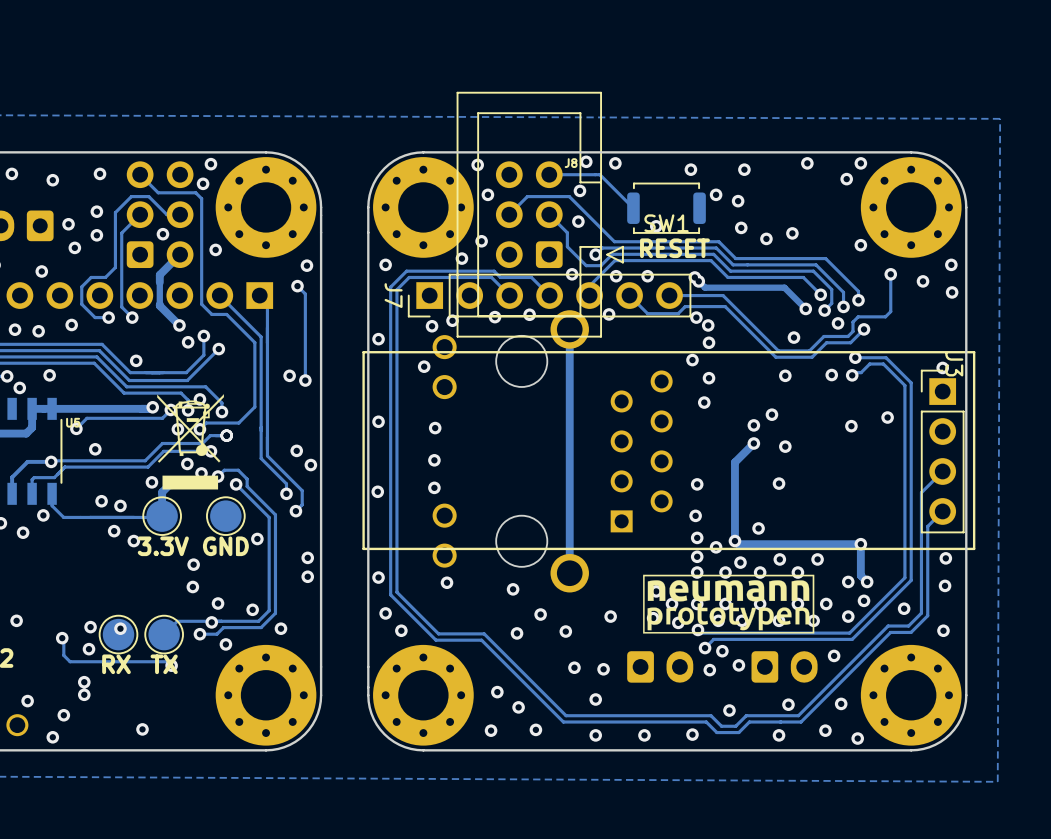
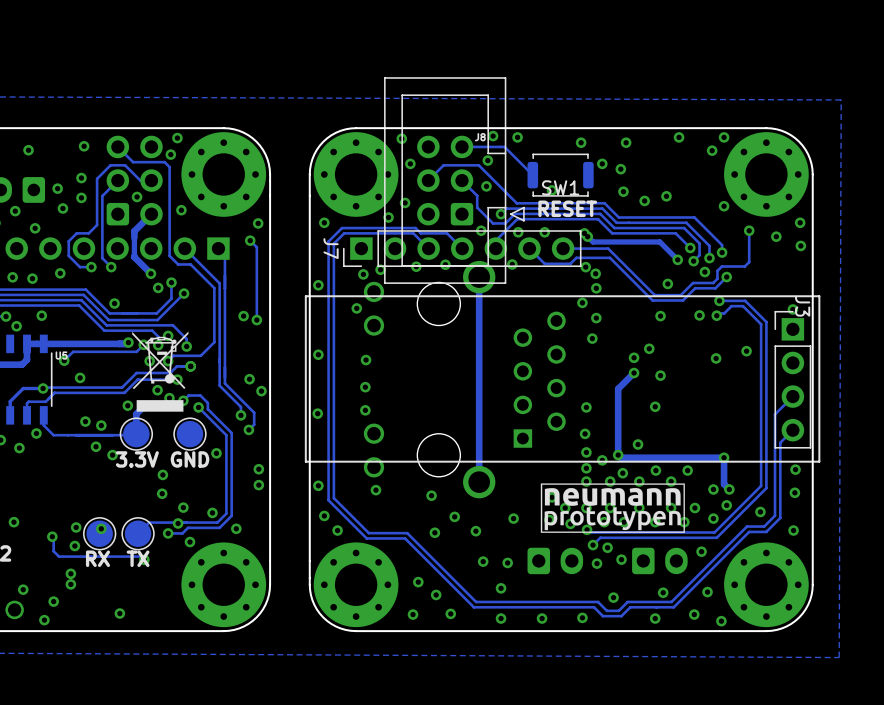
via: (11, 173) -> none
via: none -> (28, 150)
via: (52, 180) -> none
via: none -> (15, 211)

